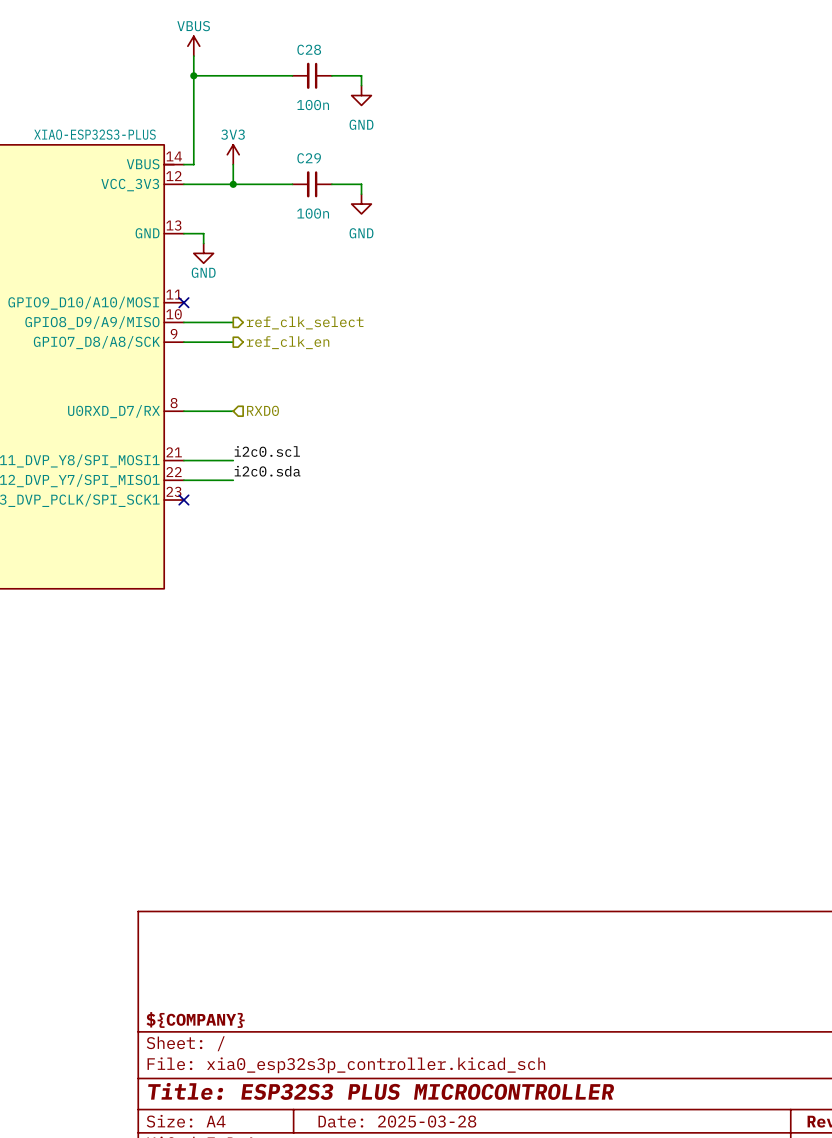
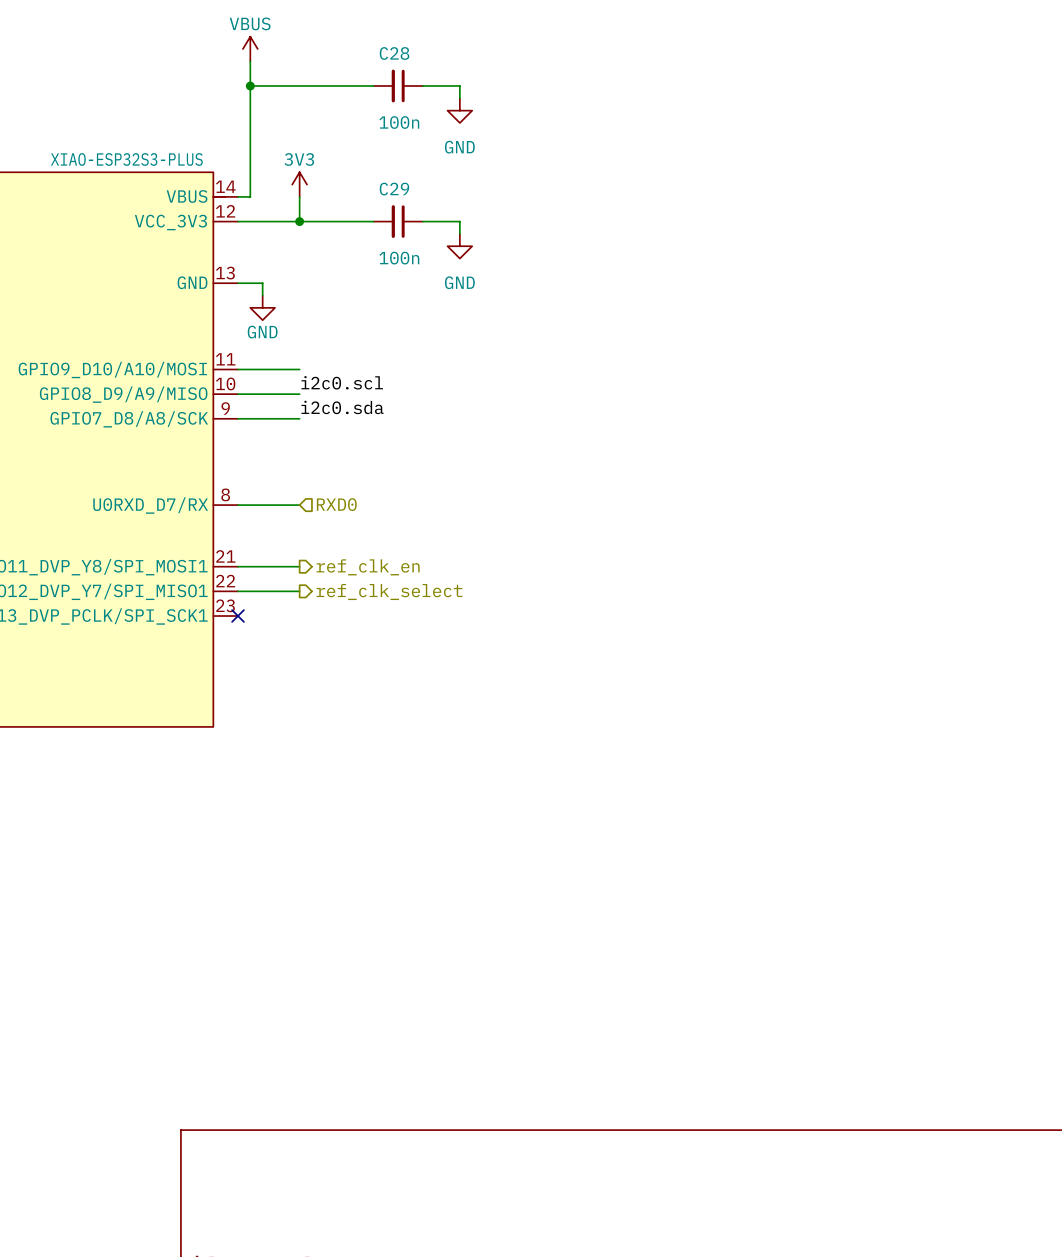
wire: none -> (238, 369) (299, 369)
no-connect mark: (183, 302) -> none
hierarchical label position: ref_clk_select (305, 322) -> ref_clk_select (389, 592)
hierarchical label position: ref_clk_en (288, 342) -> ref_clk_en (368, 567)
label position: i2c0.scl (267, 451) -> i2c0.scl (342, 382)
label position: i2c0.sda (267, 471) -> i2c0.sda (342, 407)

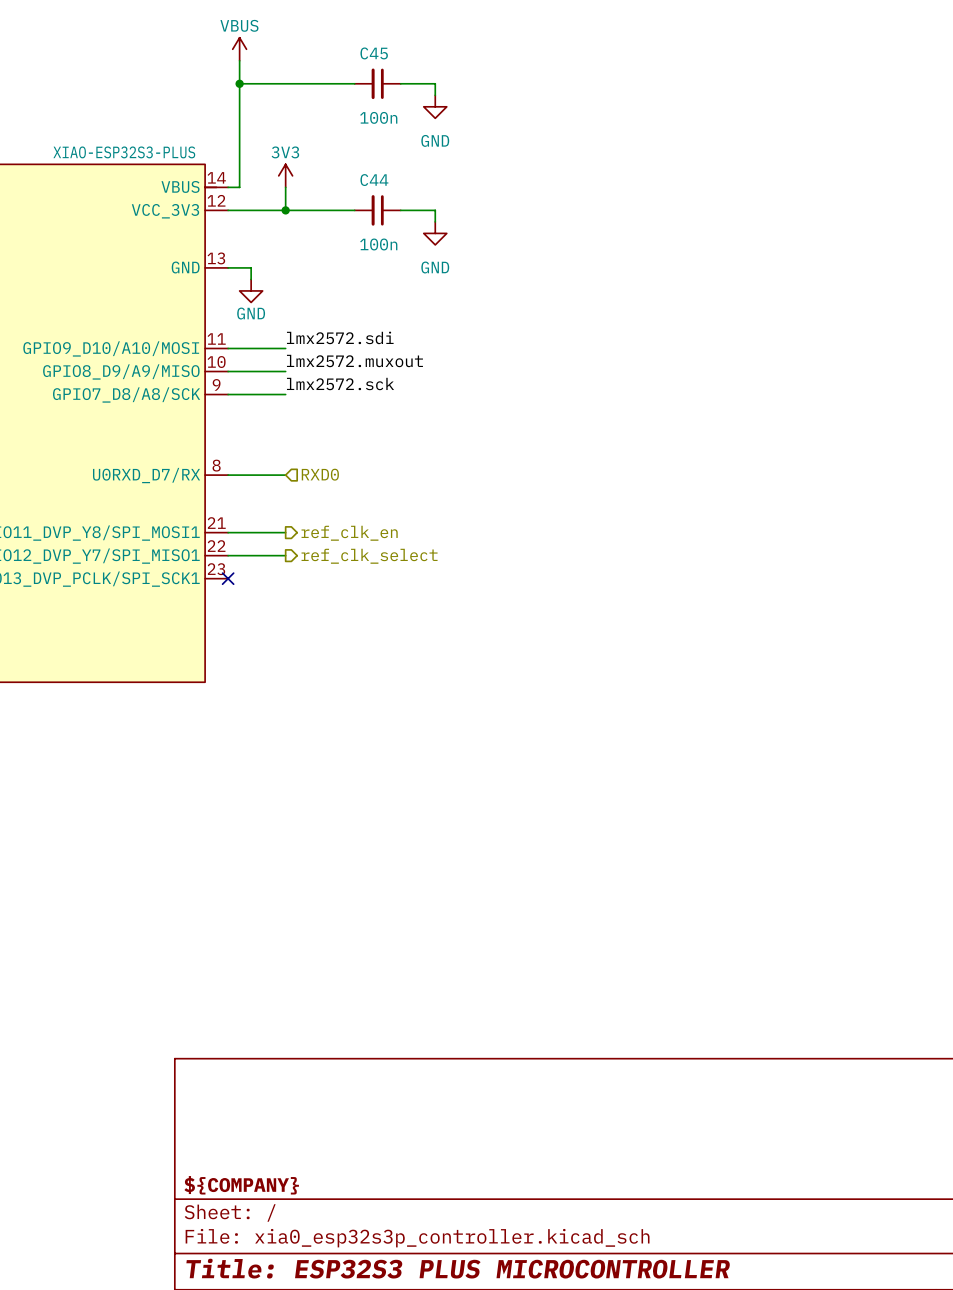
C28 name: C28 (394, 53) -> C45 (374, 53)
C29 name: C29 (394, 189) -> C44 (374, 180)
label: none -> lmx2572.sdi (340, 337)
label: i2c0.scl (342, 382) -> lmx2572.muxout (354, 360)
label: i2c0.sda (342, 407) -> lmx2572.sck (340, 384)

